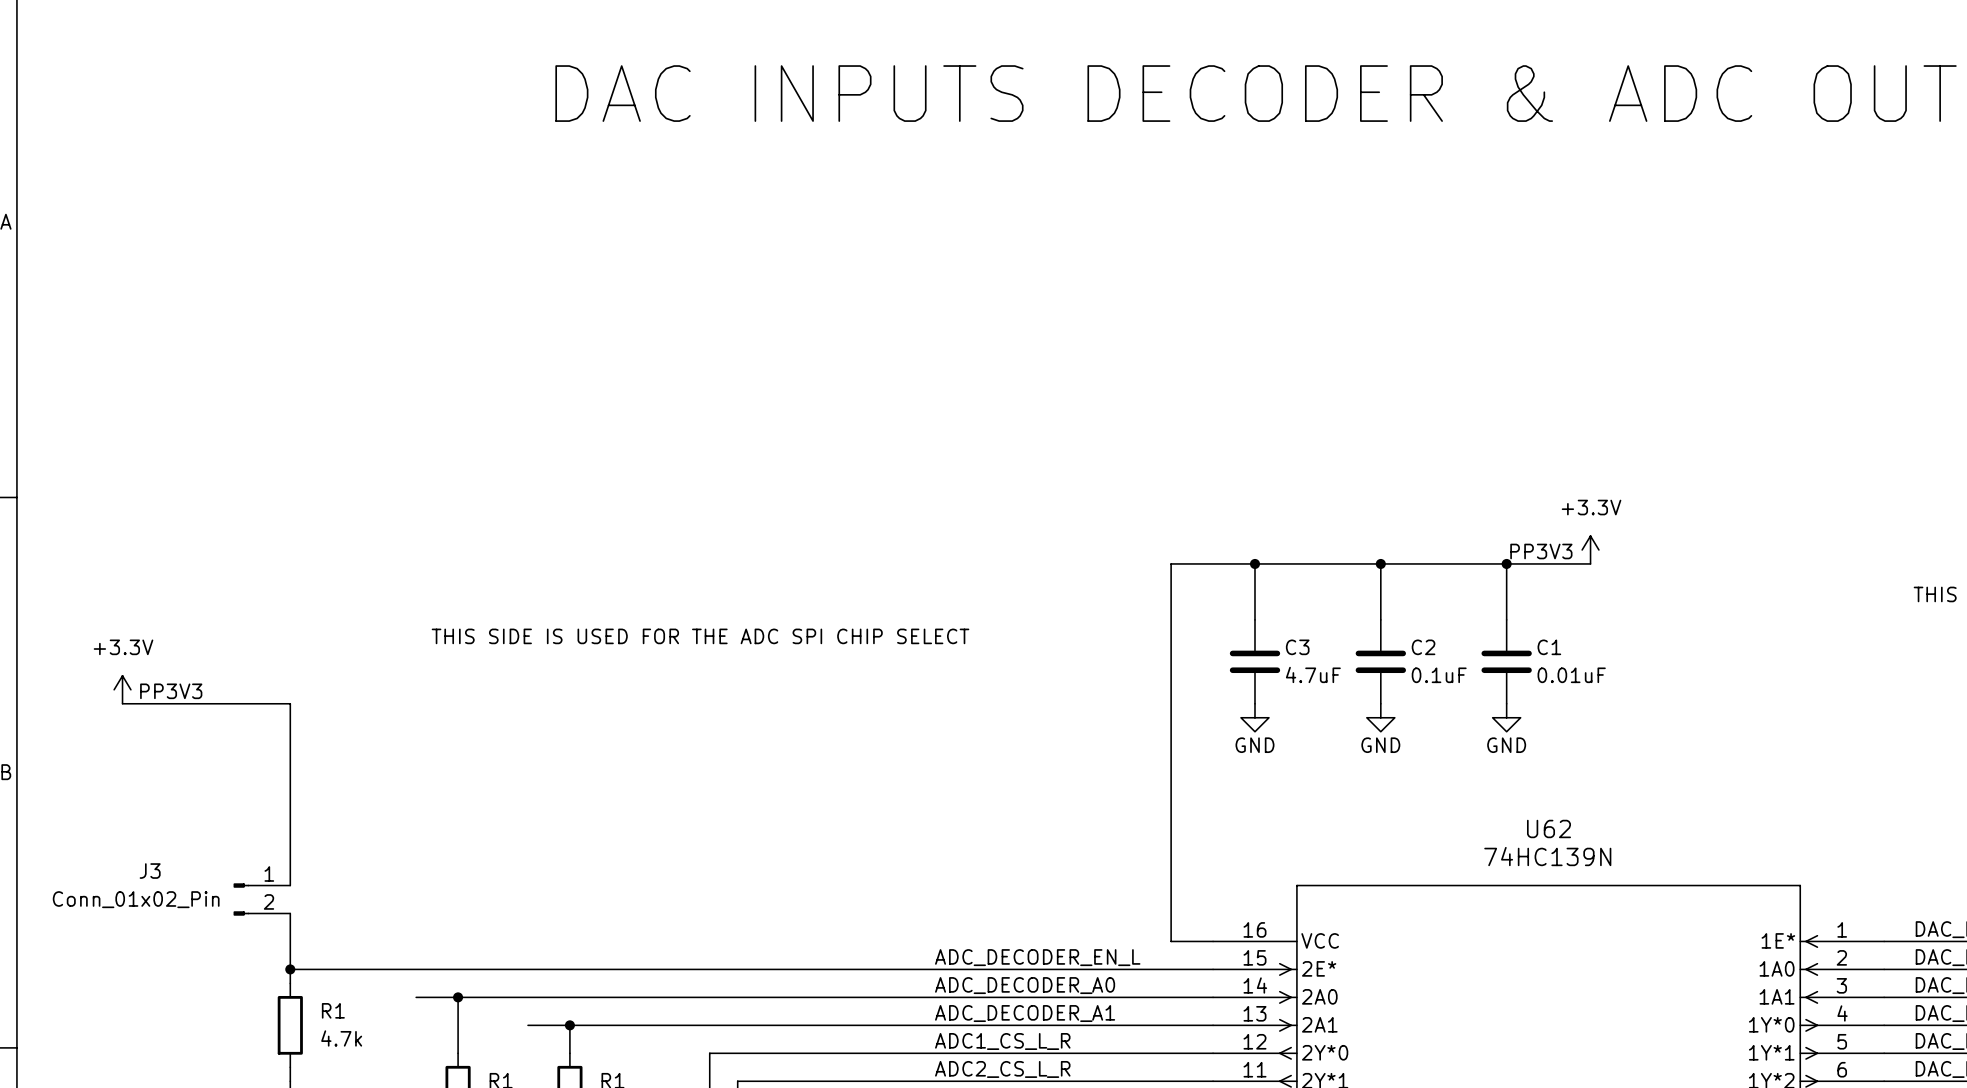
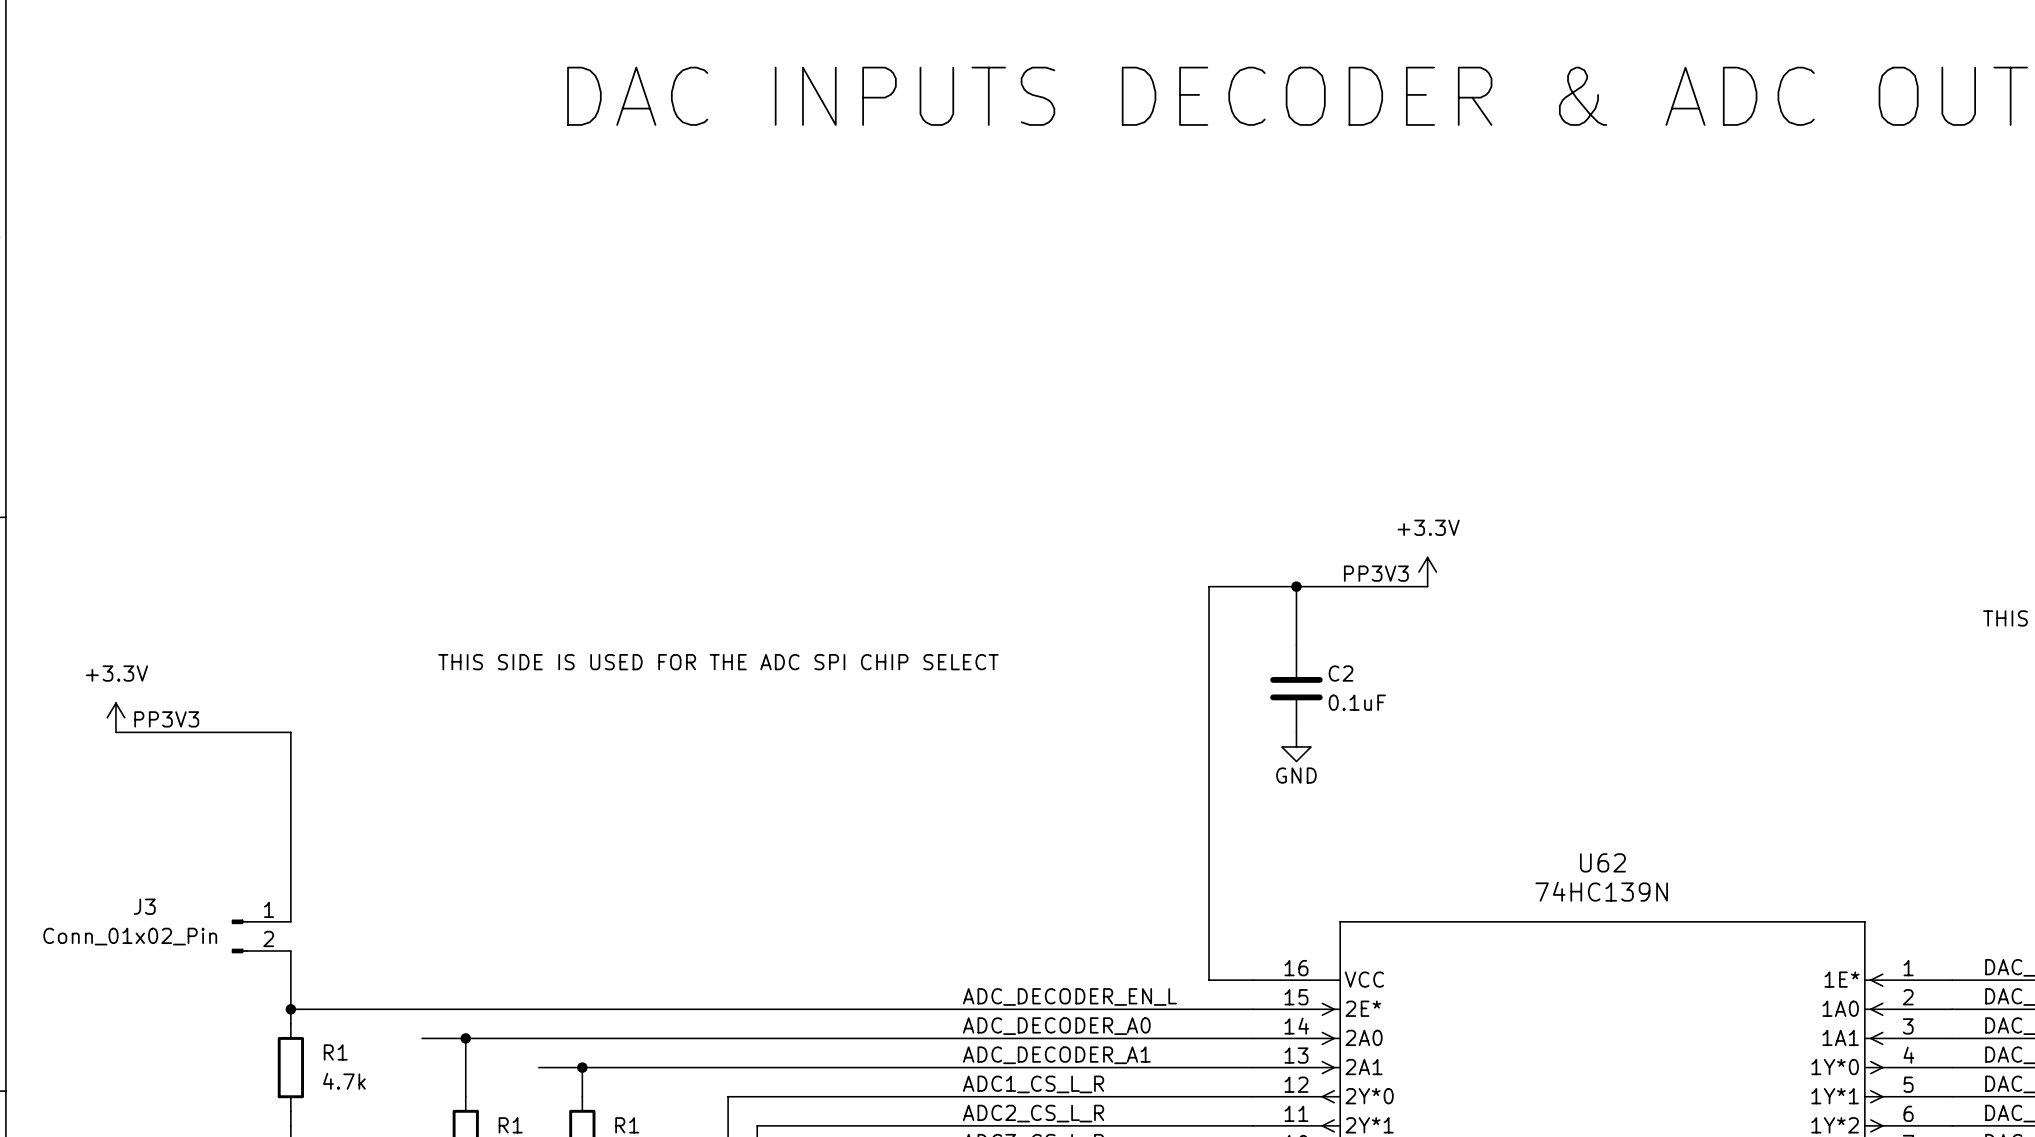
power symbol position: +3.3V (1590, 549) -> +3.3V (1427, 572)
label position: PP3V3 (1541, 551) -> PP3V3 (1376, 573)
junction: (1380, 563) -> none
wire: (1506, 563) (1506, 619) -> none
junction: (1506, 563) -> none
wire: (1590, 563) (1380, 563) (1380, 619) -> none
C3 name: C3 (1297, 647) -> C2 (1340, 673)
C2: 0.1uF (1380, 661) -> none
C1: 0.01uF (1506, 661) -> none
C3 value: 4.7uF (1313, 674) -> 0.1uF (1357, 702)
power symbol: GND (1380, 717) -> none
power symbol: GND (1506, 717) -> none

